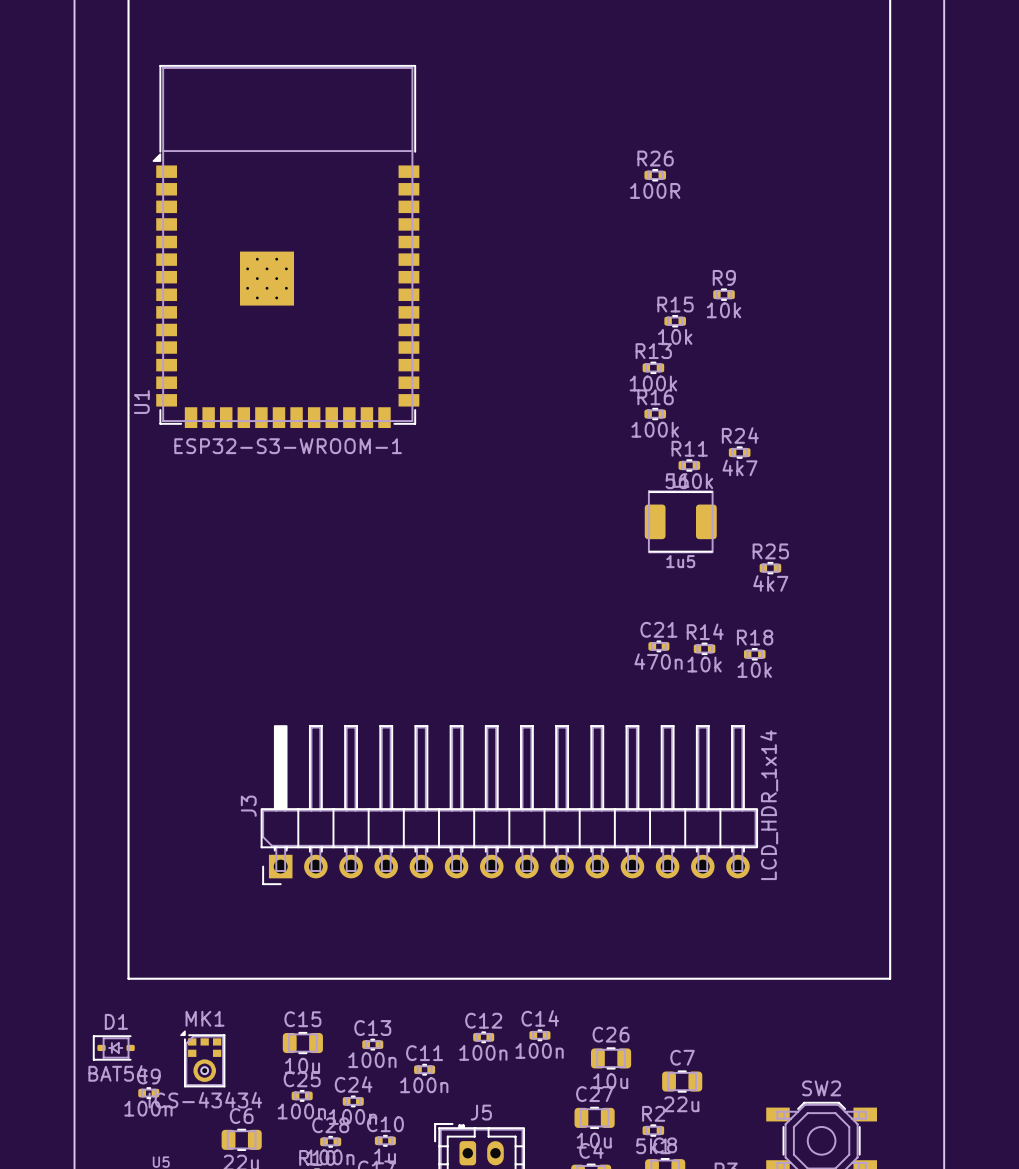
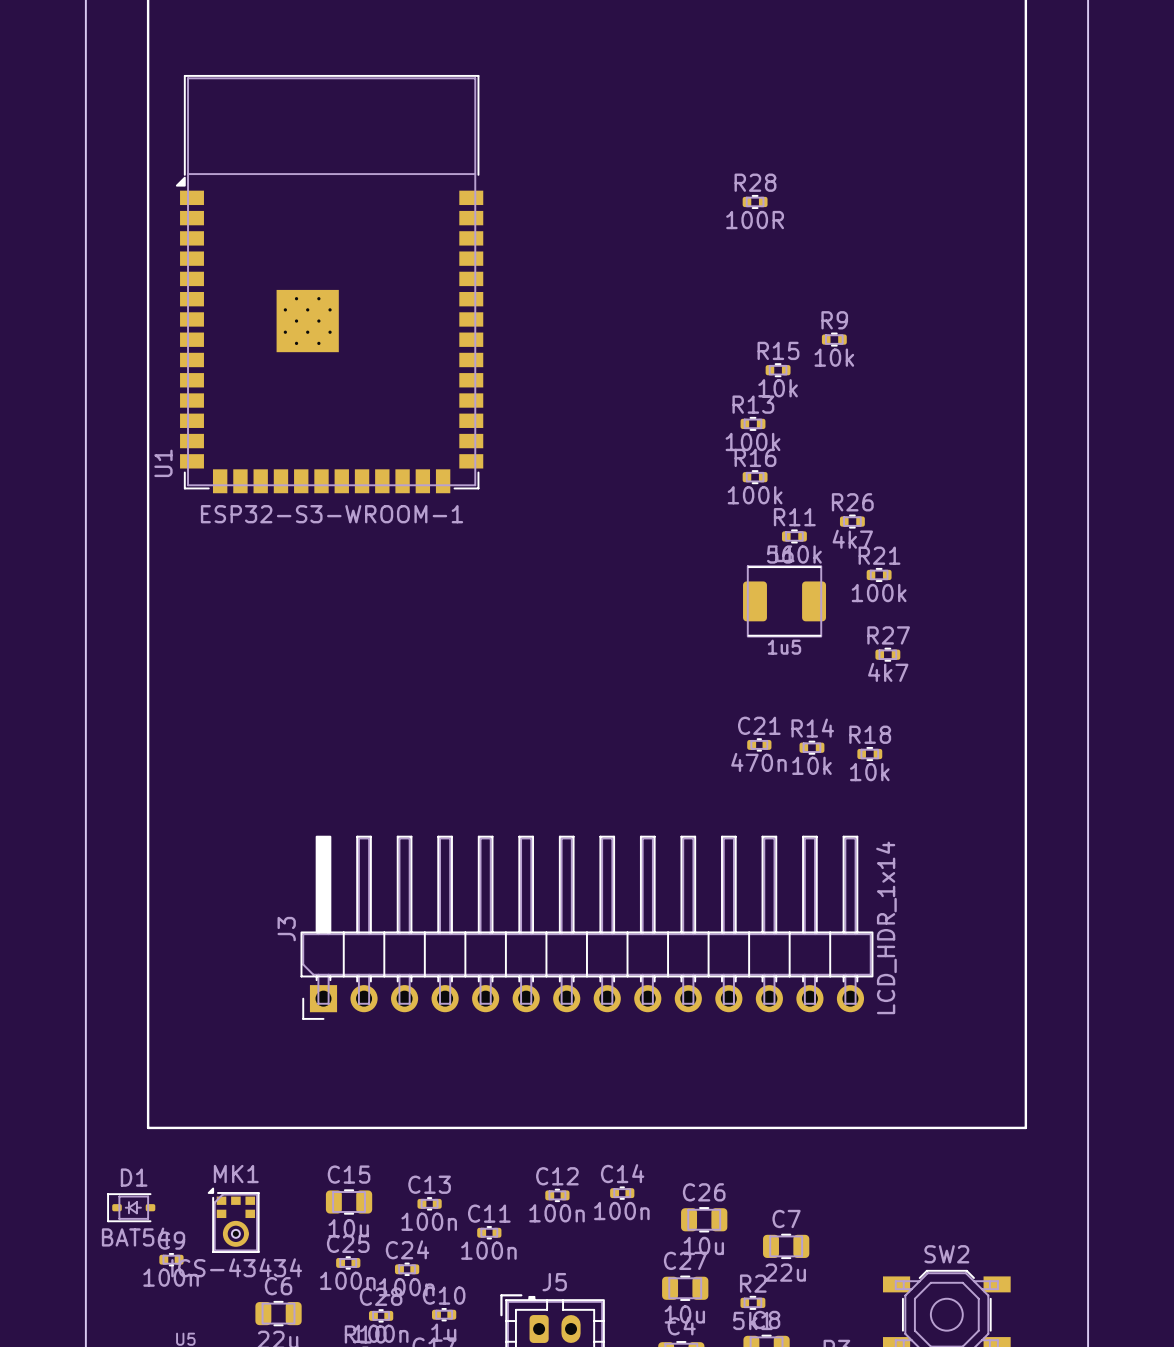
R26 name: R26 (655, 158) -> R28 (755, 182)
R24 name: R24 (740, 435) -> R26 (852, 502)
R21: none -> 100k (879, 574)
R25 name: R25 (770, 551) -> R27 (888, 635)

